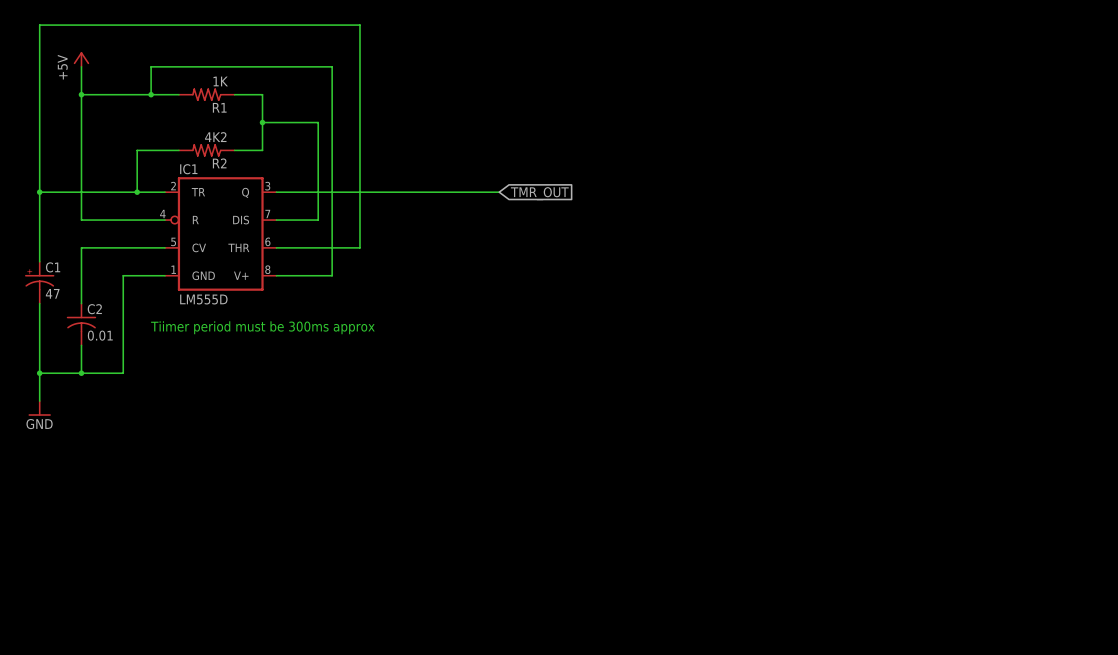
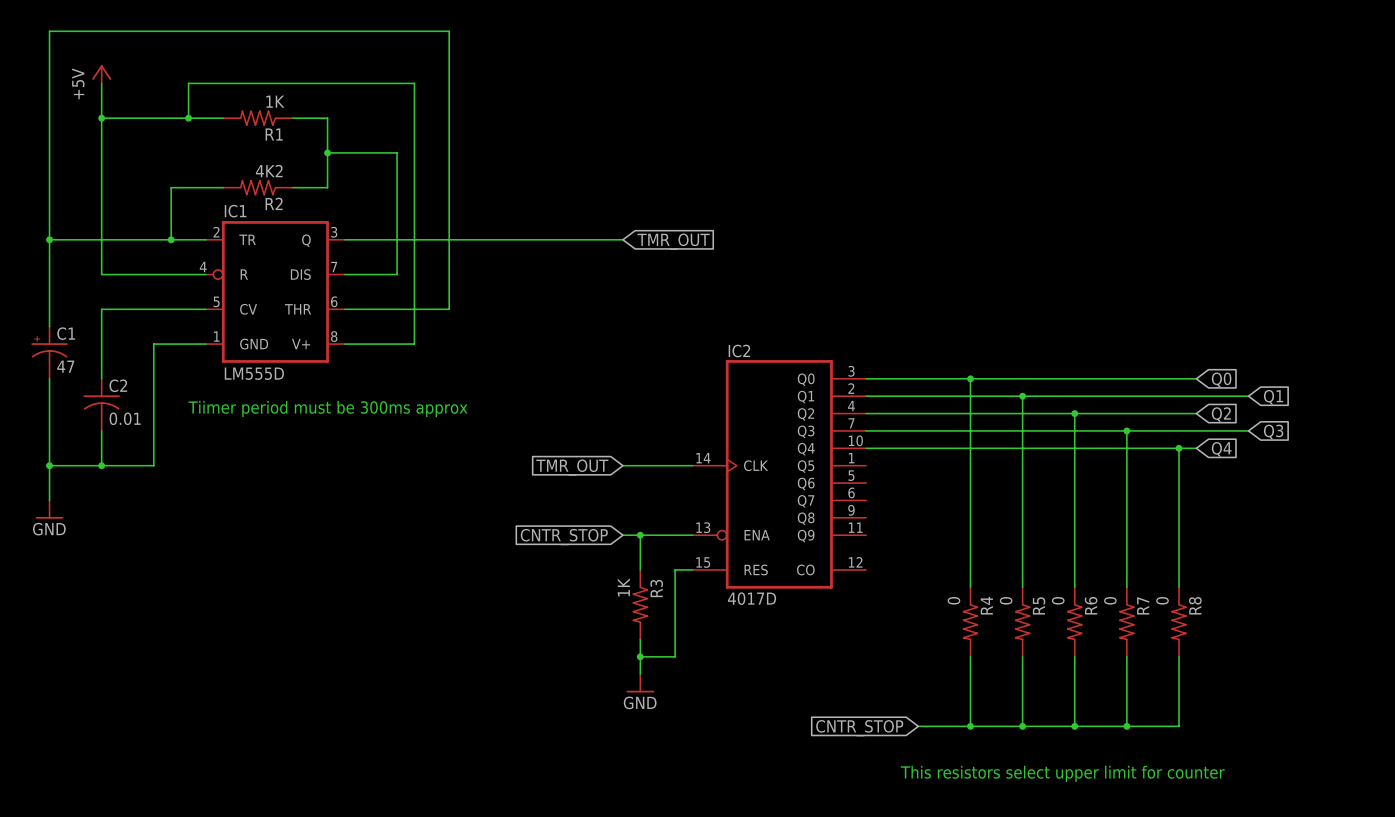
wire: none -> (866, 378) (1196, 378)
wire: none -> (970, 378) (970, 587)
junction: none -> (970, 378)
global label: none -> Q0 (1221, 379)
wire: none -> (866, 396) (1248, 396)
wire: none -> (1022, 396) (1022, 587)
junction: none -> (1022, 396)
global label: none -> Q1 (1273, 397)
wire: none -> (866, 413) (1196, 413)
wire: none -> (1074, 413) (1074, 587)
junction: none -> (1074, 413)
global label: none -> Q2 (1221, 414)
wire: none -> (866, 430) (1248, 430)
wire: none -> (1126, 430) (1126, 587)
junction: none -> (1126, 430)
global label: none -> Q3 (1273, 431)
wire: none -> (866, 448) (1196, 448)
wire: none -> (1179, 448) (1179, 587)
junction: none -> (1179, 448)
global label: none -> Q4 (1221, 449)
wire: none -> (622, 465) (692, 465)
global label: none -> TMR_OUT (572, 467)
IC2: none -> 4017D (779, 474)
wire: none -> (622, 535) (692, 535)
wire: none -> (640, 535) (640, 569)
junction: none -> (640, 535)
global label: none -> CNTR_STOP (564, 537)
wire: none -> (692, 569) (675, 569) (675, 656) (640, 656)
R3: none -> 1K (640, 604)
R4: none -> 0 (970, 622)
R5: none -> 0 (1022, 622)
R6: none -> 0 (1074, 622)
R7: none -> 0 (1126, 622)
R8: none -> 0 (1179, 622)
wire: none -> (640, 639) (640, 674)
junction: none -> (640, 656)
wire: none -> (970, 656) (970, 726)
wire: none -> (1022, 656) (1022, 726)
wire: none -> (1074, 656) (1074, 726)
wire: none -> (1126, 656) (1126, 726)
wire: none -> (1179, 656) (1179, 726) (918, 726)
power symbol: none -> GND (640, 683)
junction: none -> (970, 726)
junction: none -> (1022, 726)
junction: none -> (1074, 726)
junction: none -> (1126, 726)
global label: none -> CNTR_STOP (859, 728)
text: none -> This resistors select upper limit for counter (1062, 773)

